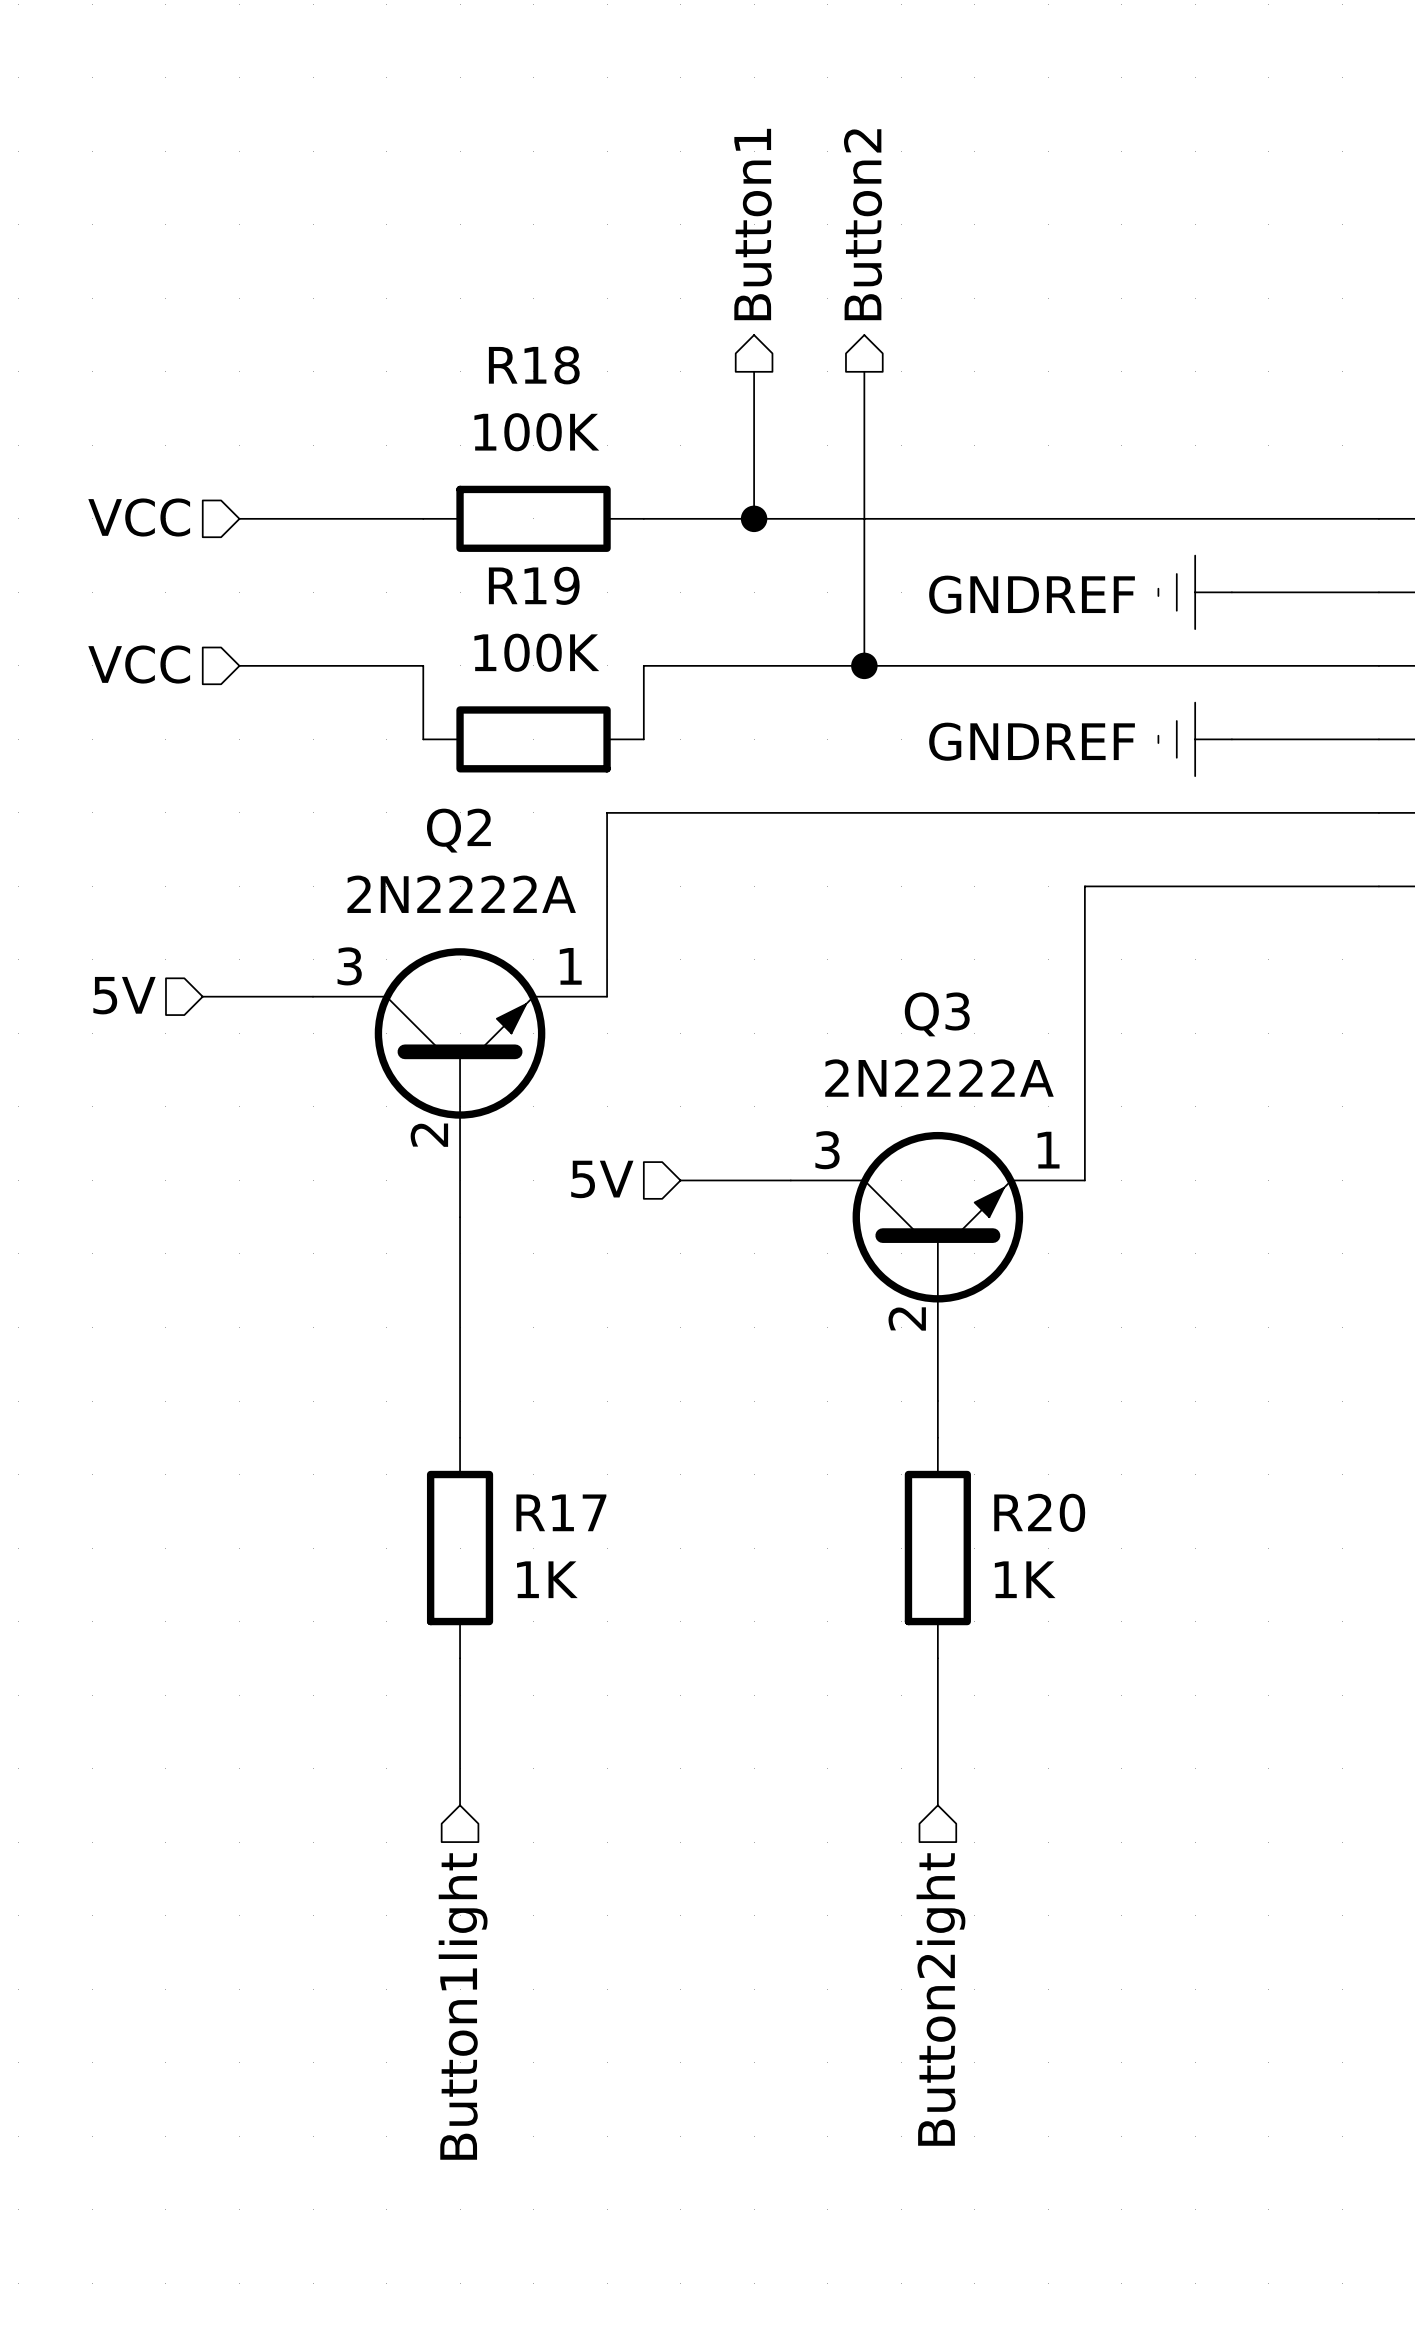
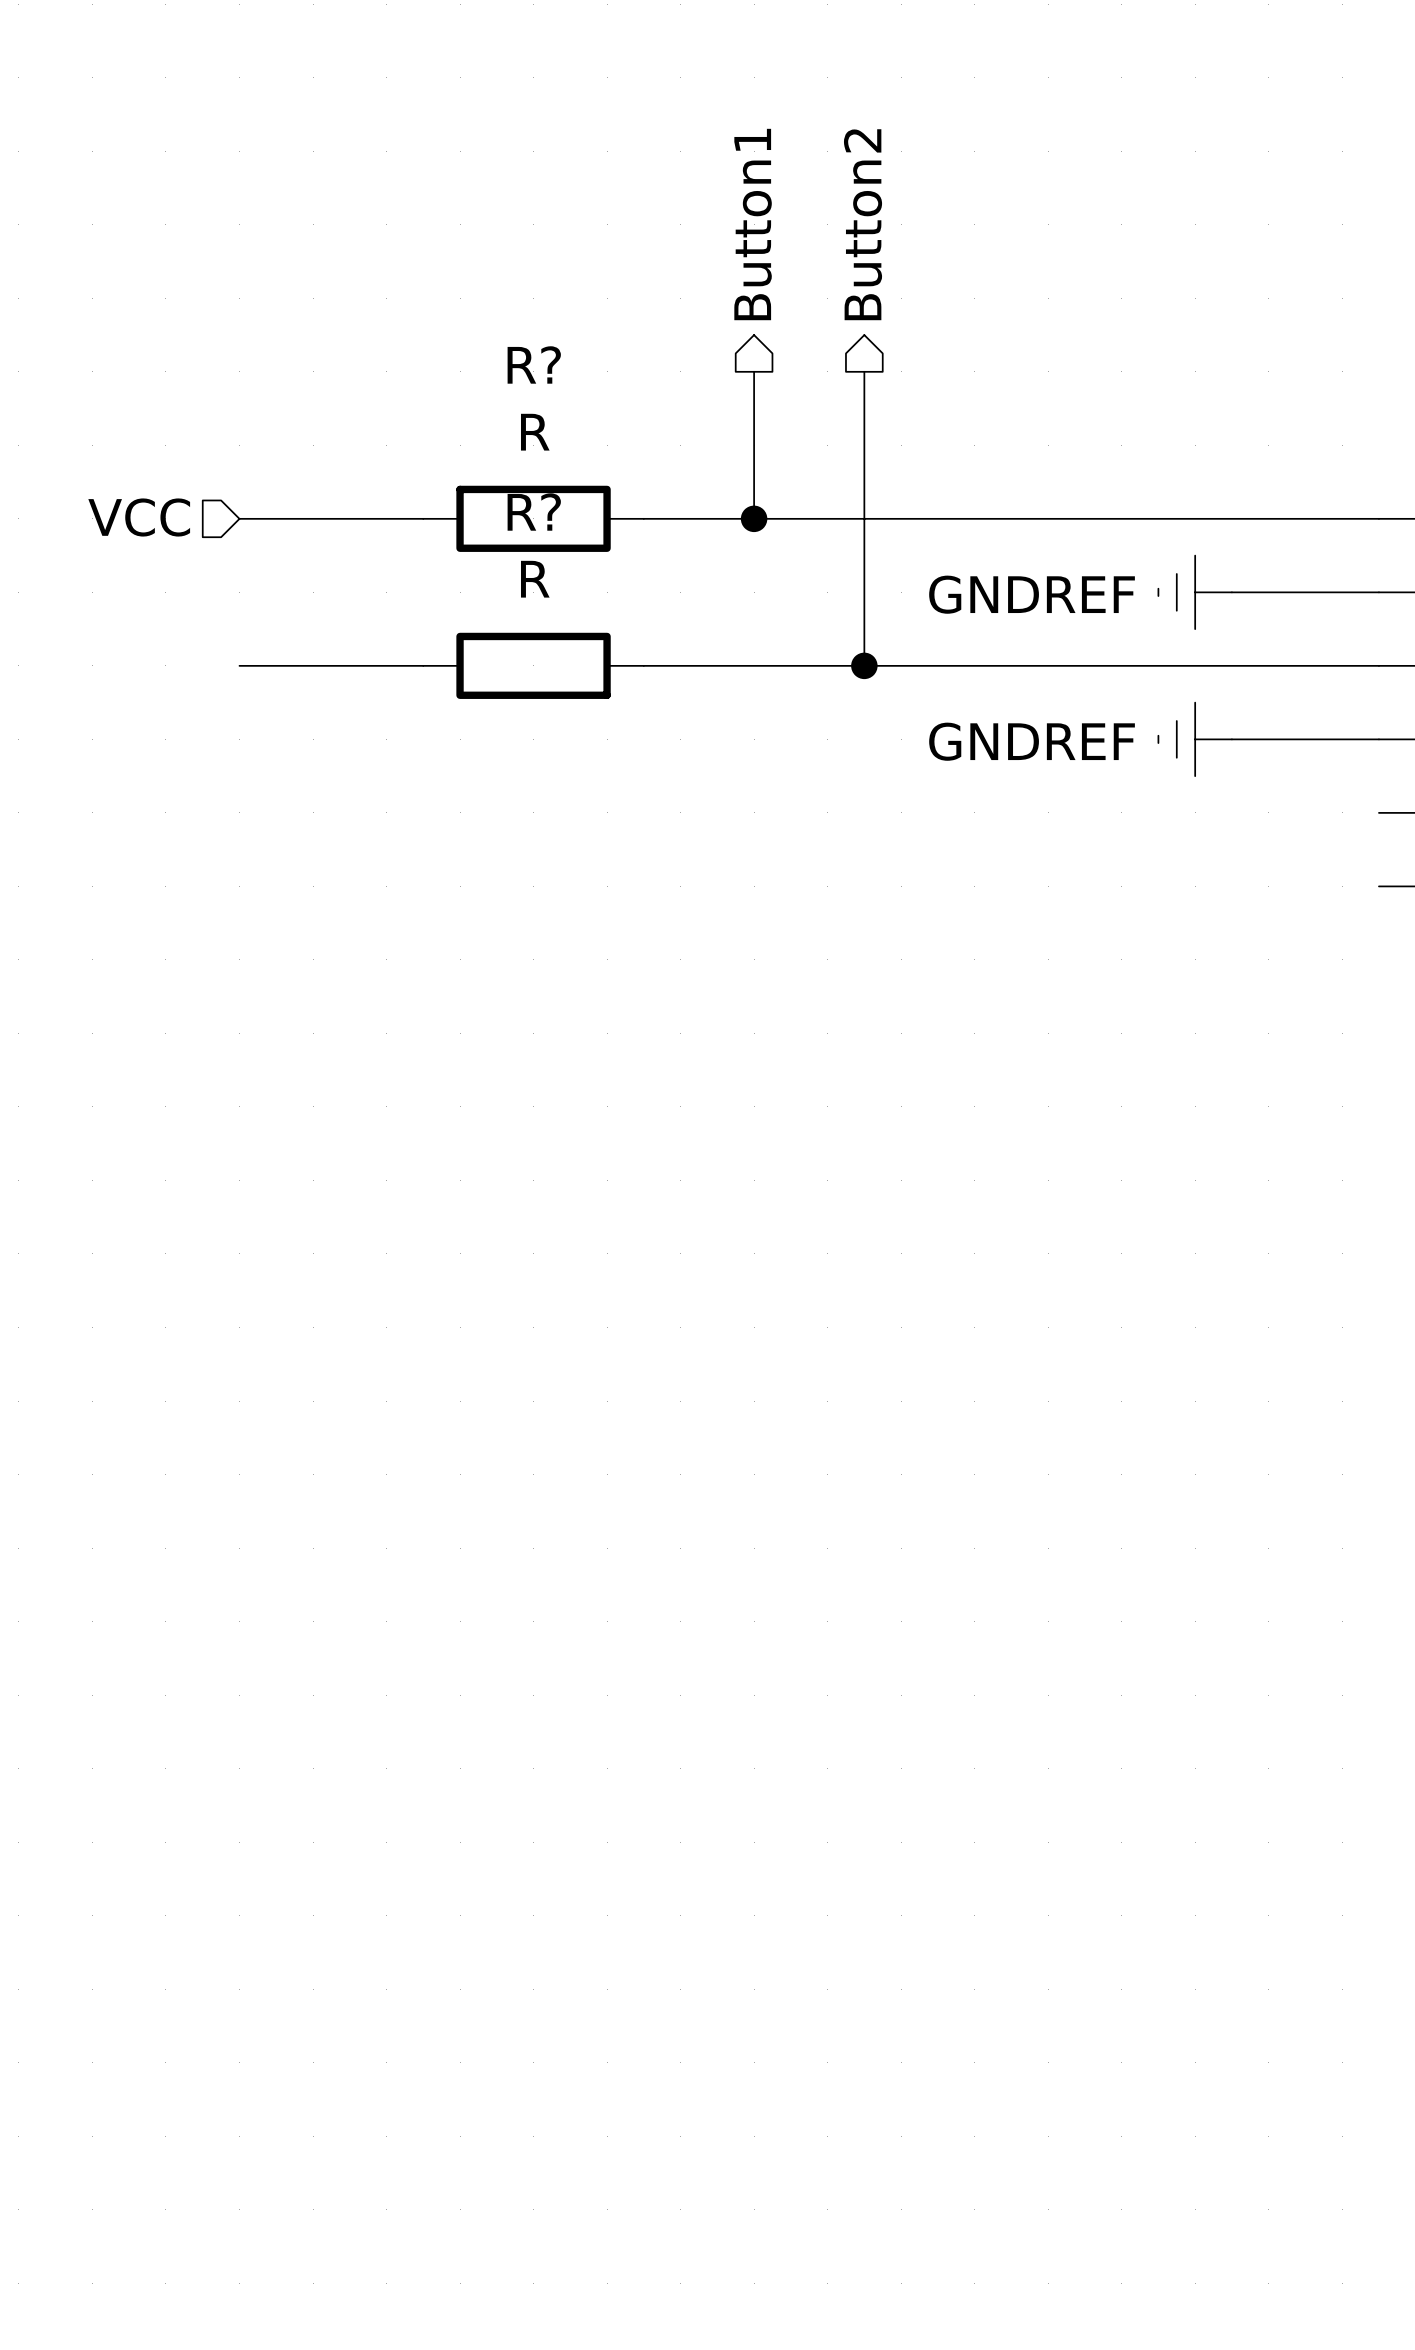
R18 name: R18 (534, 365) -> R? (534, 364)
R18 value: 100K (536, 432) -> R (535, 432)
hierarchical label: VCC (139, 664) -> none
wire: (423, 665) (423, 739) -> none
R?: none -> R (533, 665)
wire: (643, 665) (643, 739) -> none
R19: 100K (533, 739) -> none
wire: (1378, 812) (607, 812) (607, 996) -> none
wire: (1378, 886) (1084, 886) (1084, 1180) -> none
hierarchical label: 5V (124, 995) -> none
wire: (202, 996) (313, 996) -> none
Q2: 2N2222A (460, 1082) -> none
hierarchical label: 5V (602, 1179) -> none
wire: (680, 1180) (790, 1180) -> none
wire: (460, 1217) (460, 1437) -> none
Q3: 2N2222A (937, 1266) -> none
wire: (937, 1401) (937, 1437) -> none
R17: 1K (460, 1548) -> none
R20: 1K (937, 1548) -> none
wire: (460, 1658) (460, 1805) -> none
wire: (937, 1658) (937, 1805) -> none
hierarchical label: Button2ight (940, 1999) -> none
hierarchical label: Button1light (463, 2006) -> none

